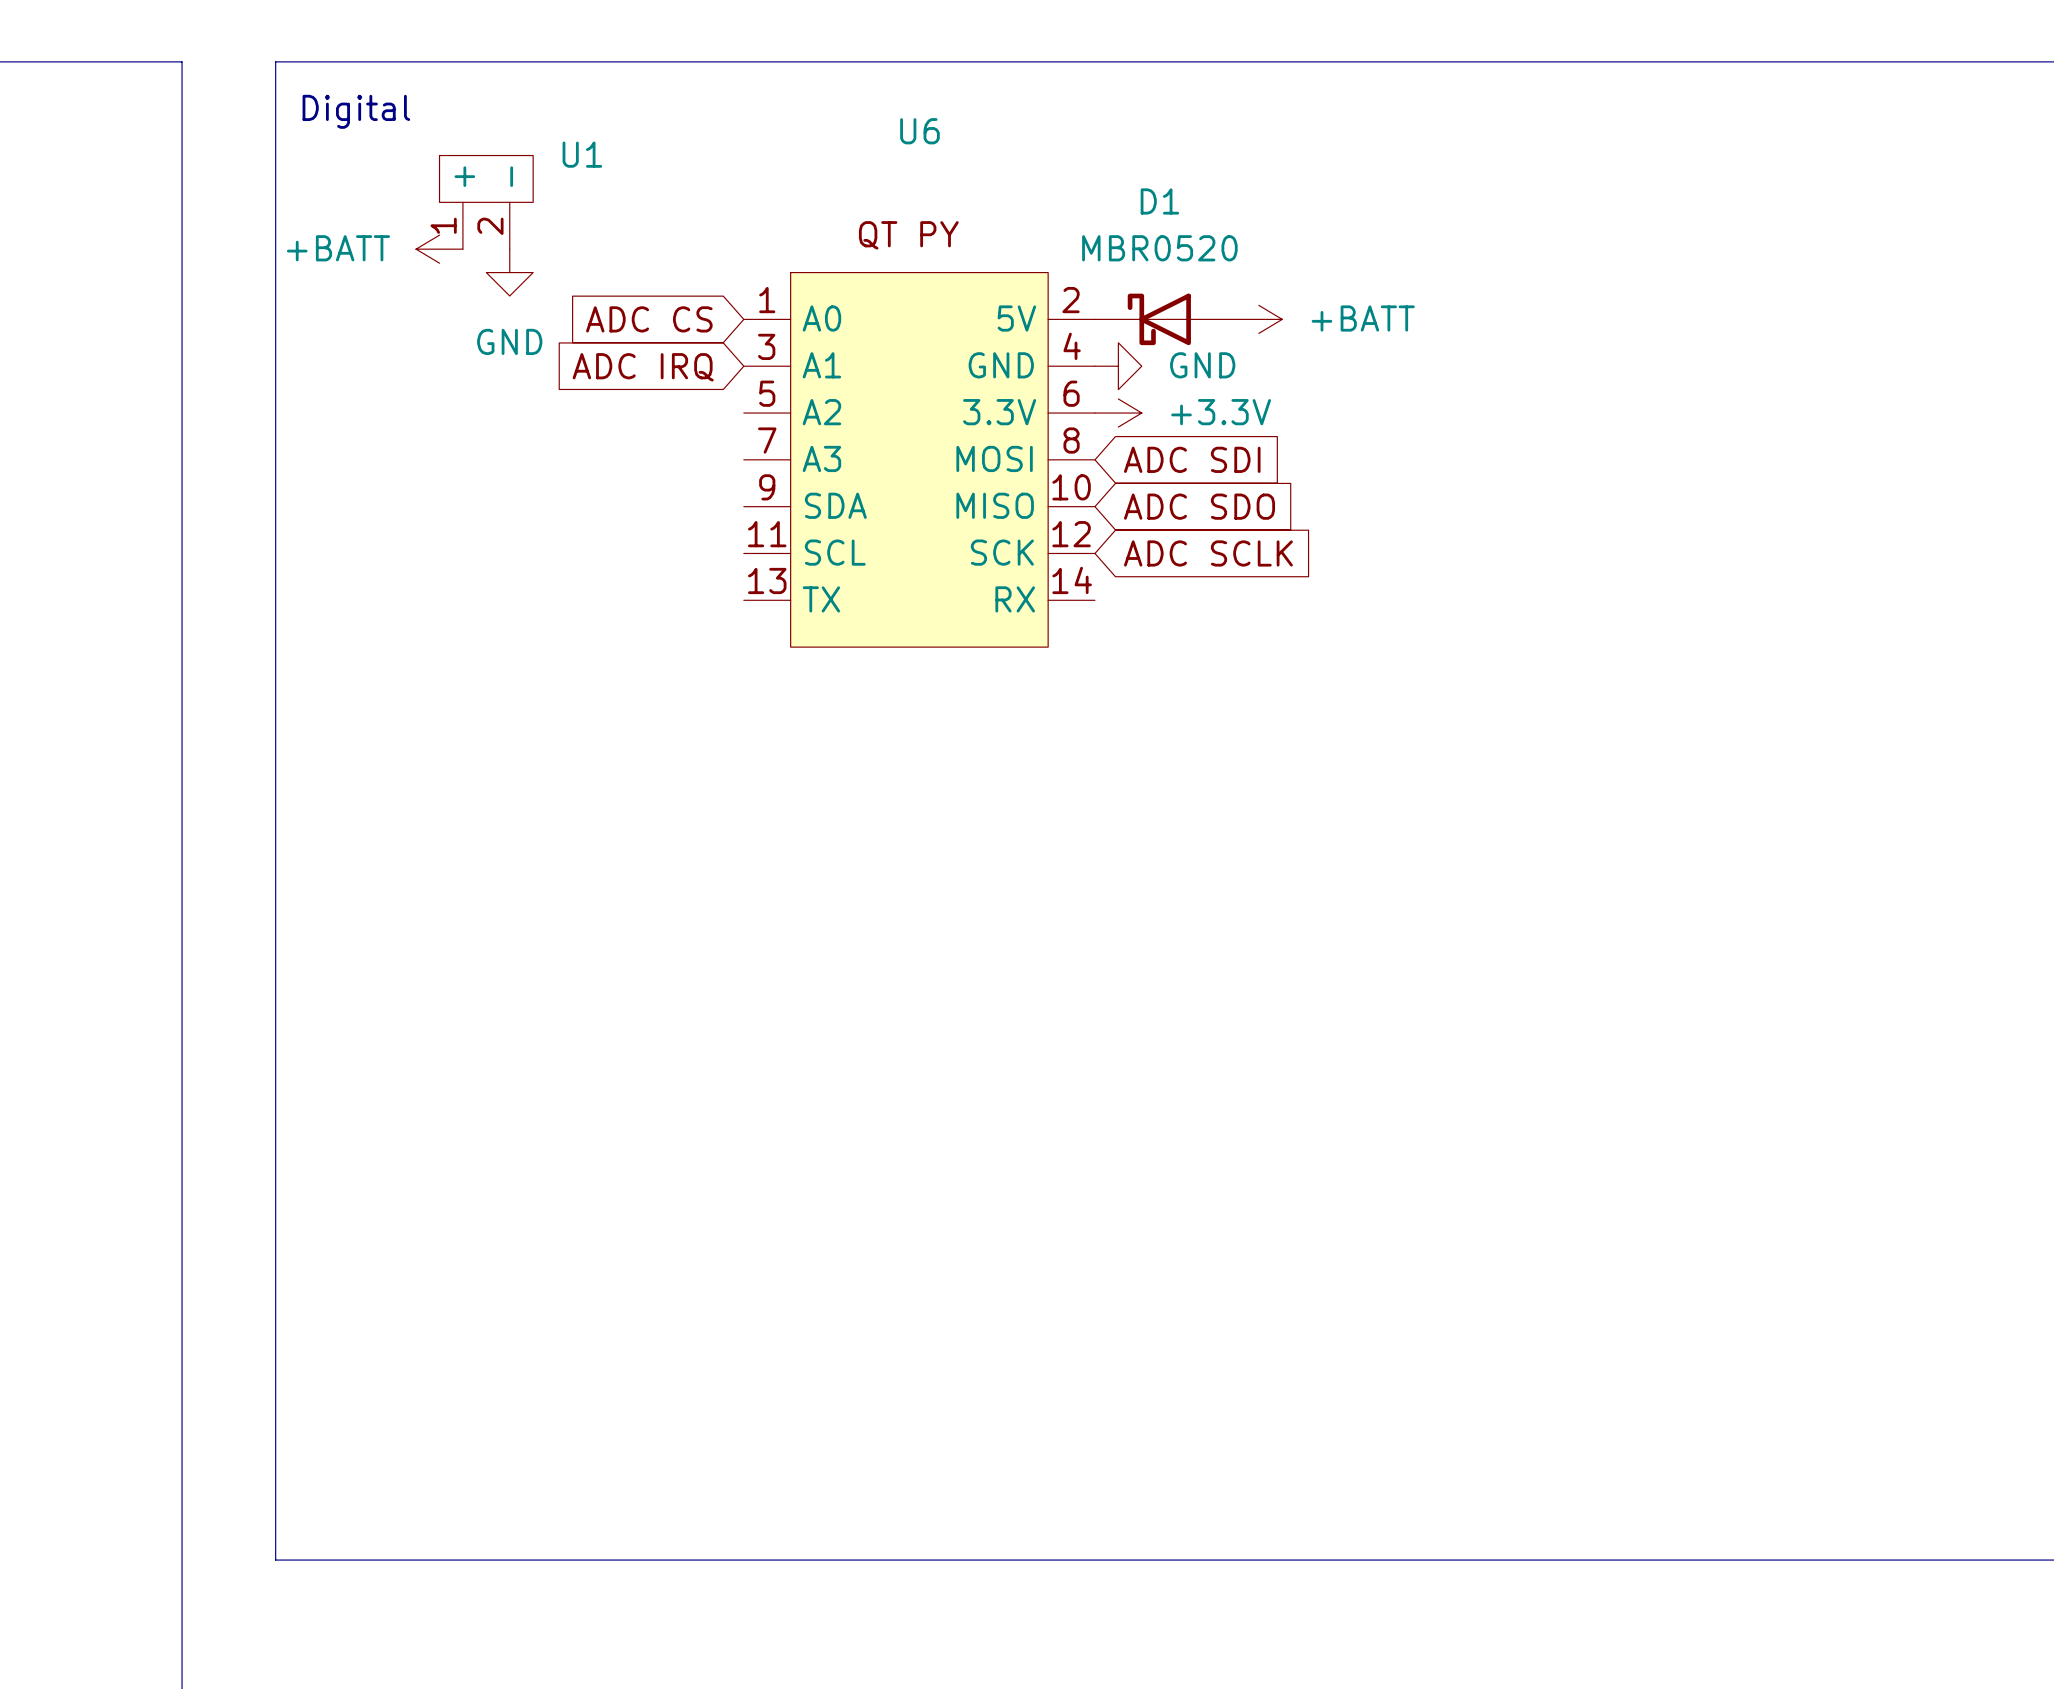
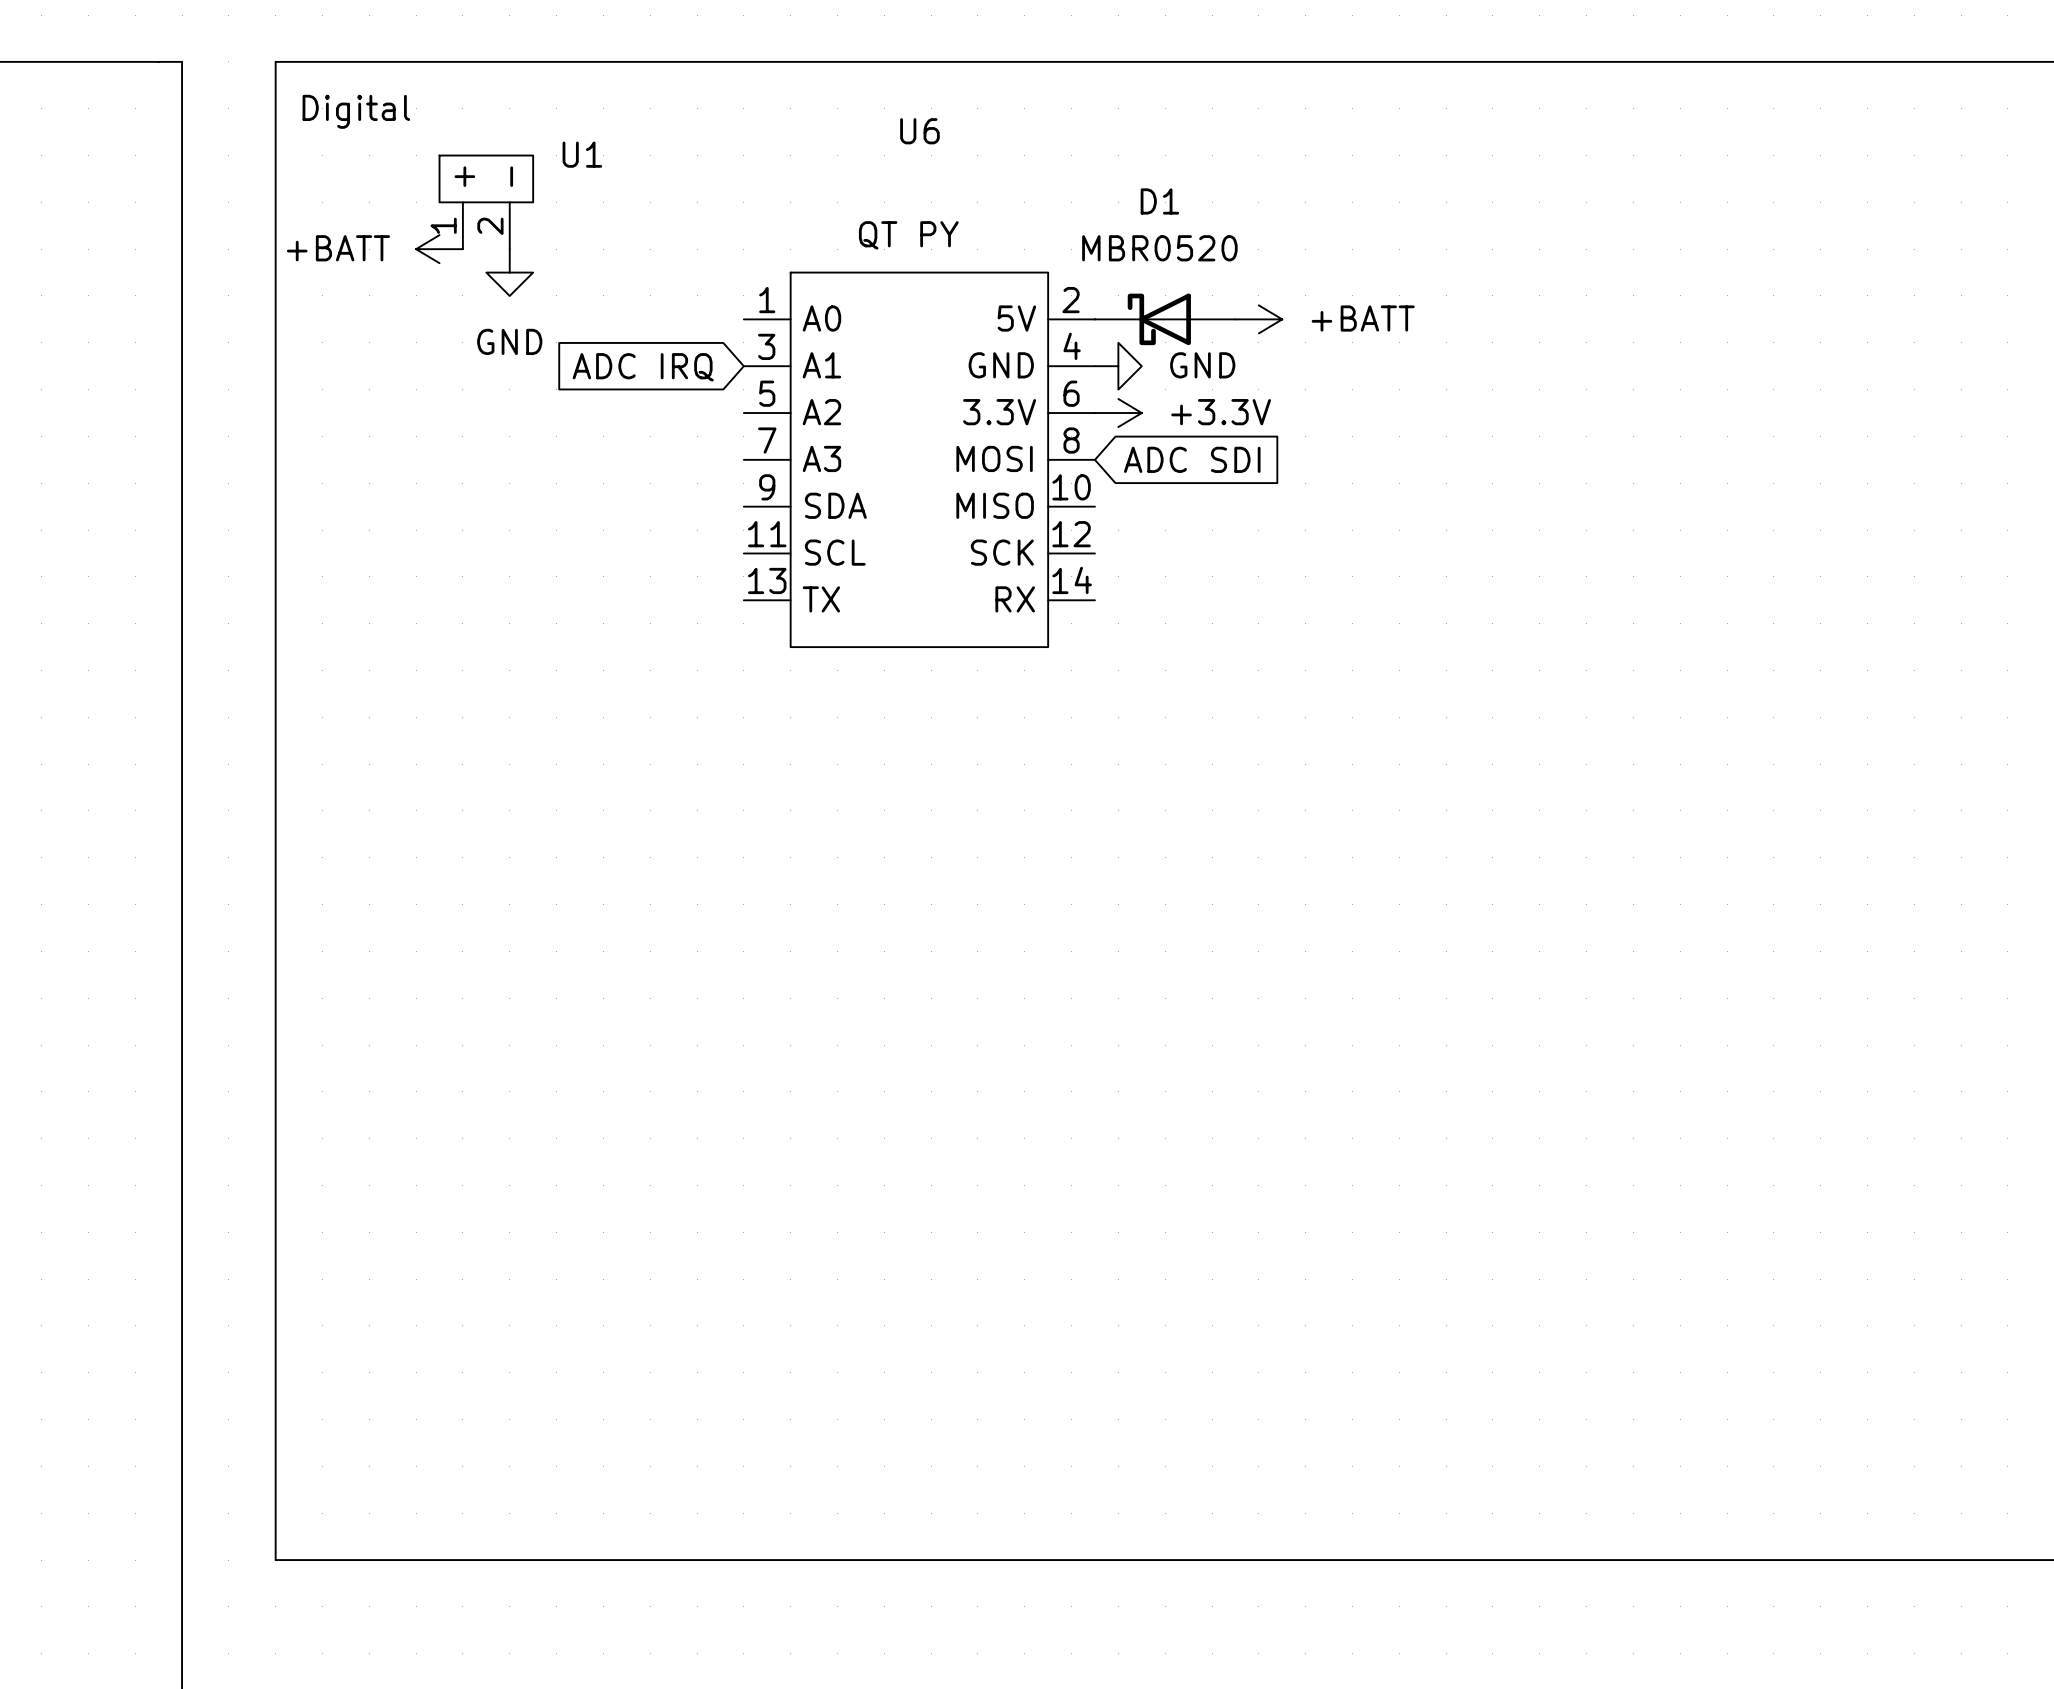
global label: ADC CS (649, 319) -> none
global label: ADC SDO (1199, 506) -> none
global label: ADC SCLK (1208, 553) -> none

